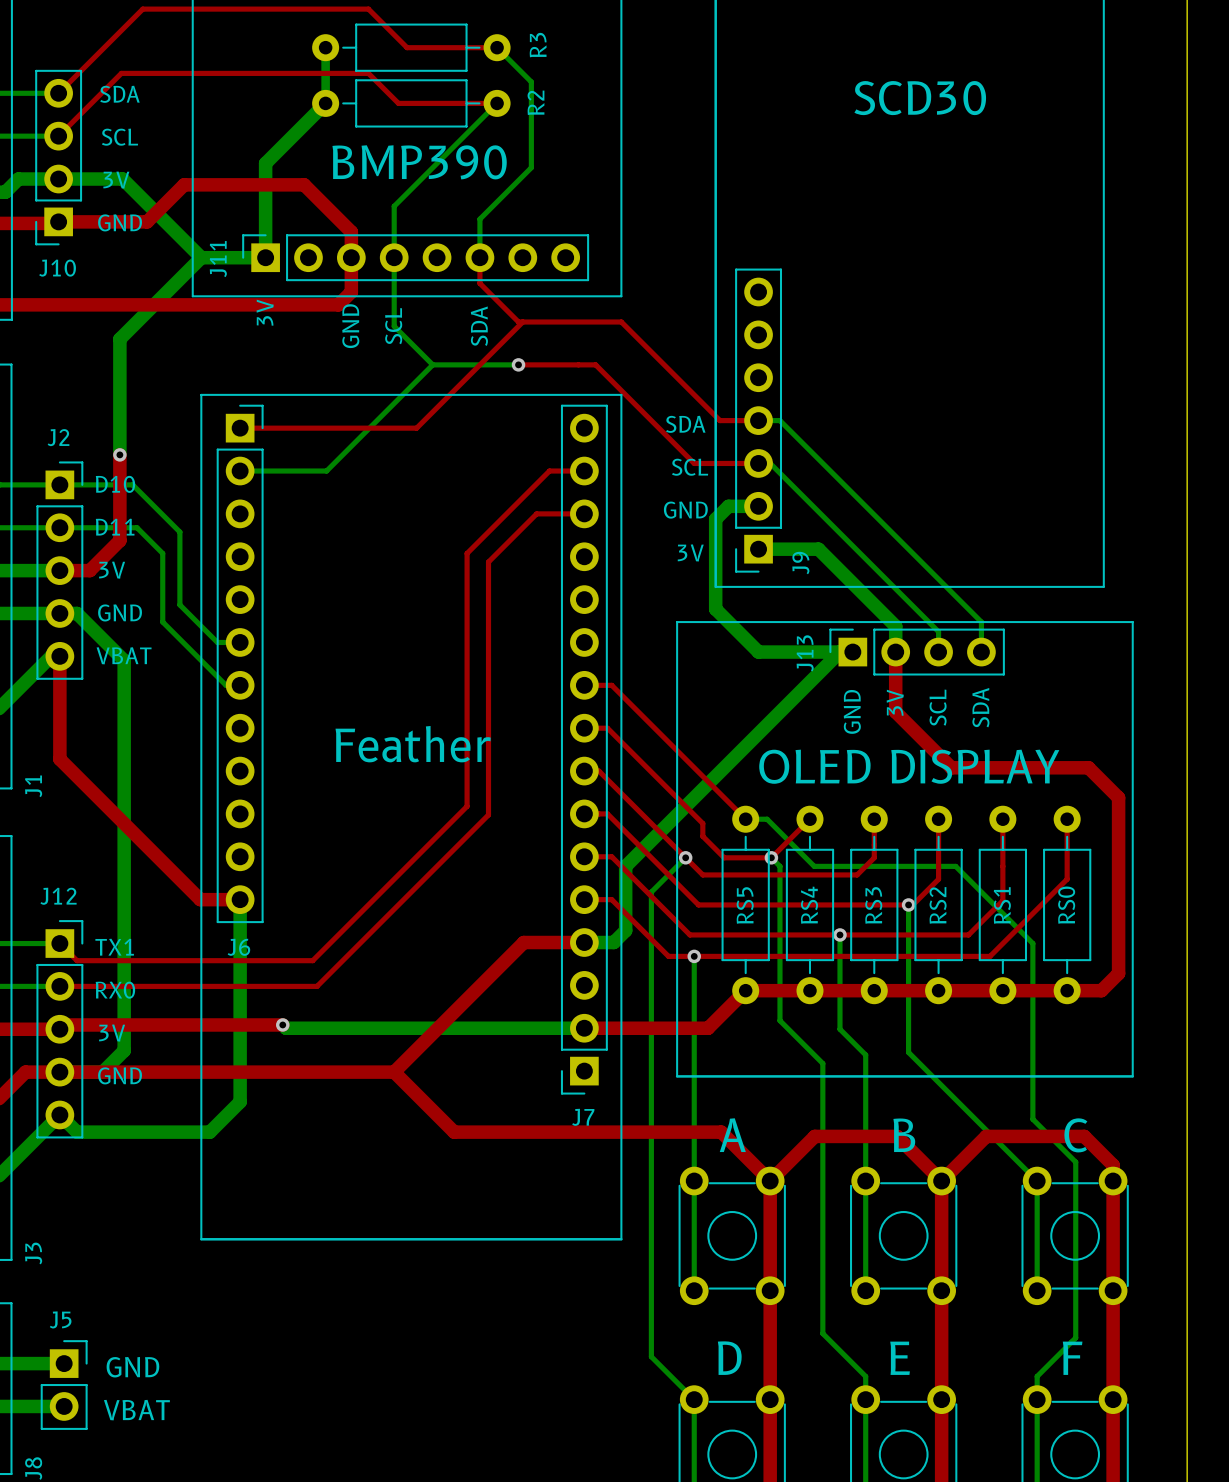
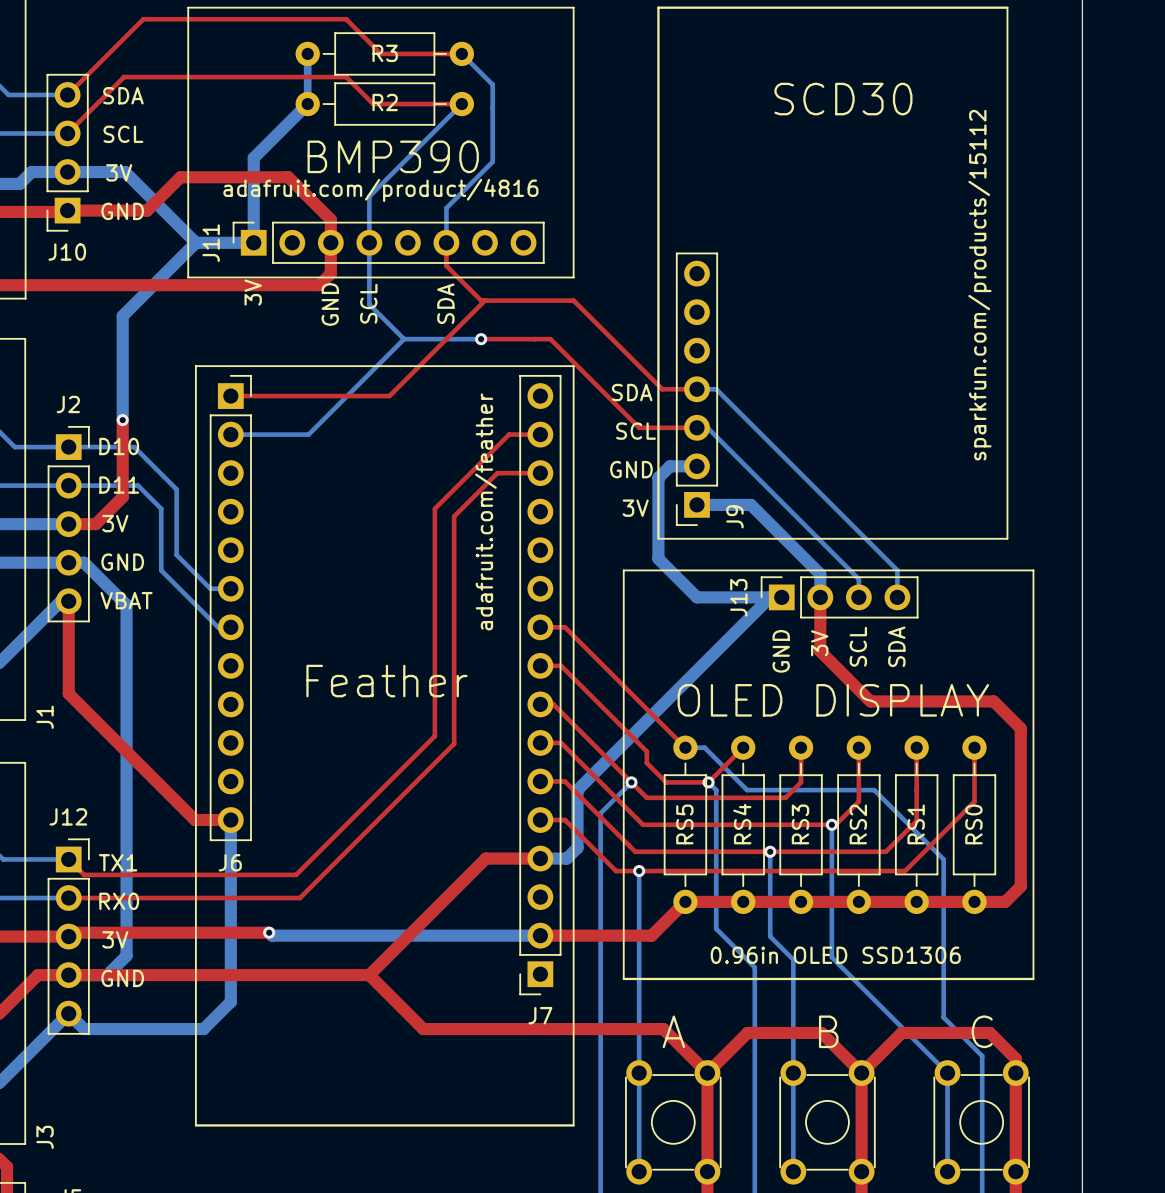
R3 name rotation: 0° (538, 45) -> 90° clockwise (385, 53)
R3 name position: R3 (538, 45) -> R3 (385, 53)
R2 name rotation: 0° (535, 102) -> 90° clockwise (385, 102)
R2 name position: R2 (535, 102) -> R2 (385, 102)
text: none -> adafruit.com/product/4816 (380, 190)
text: none -> sparkfun.com/products/15112 (979, 285)
text: none -> adafruit.com/feather (485, 511)
text: none -> 0.96in OLED SSD1306 (835, 955)

